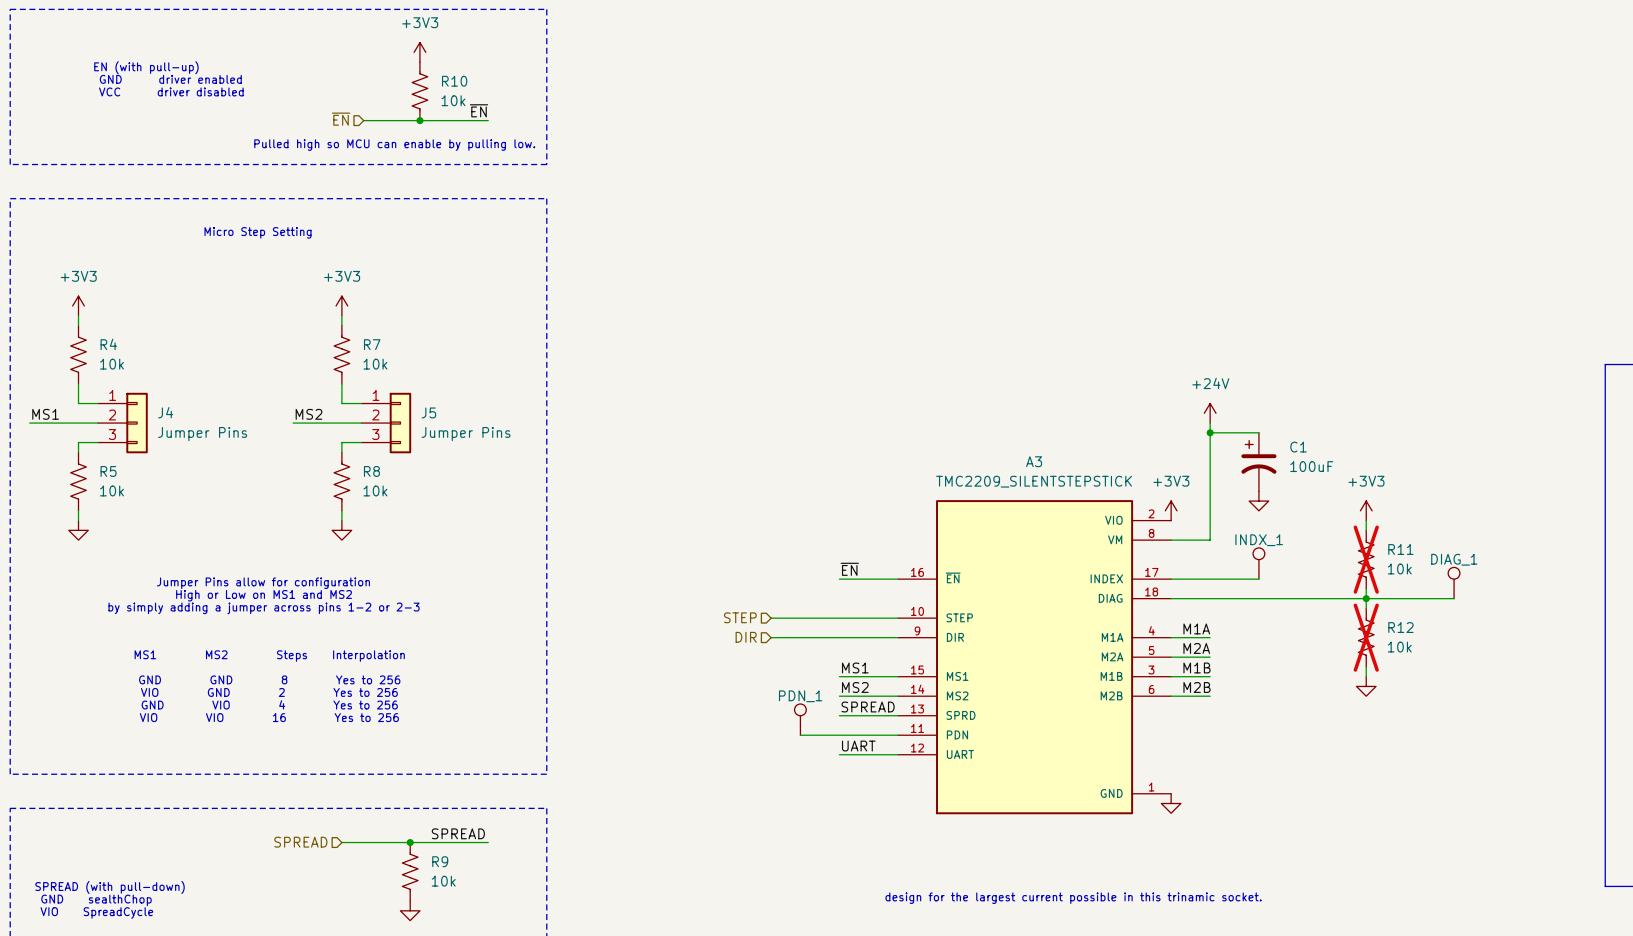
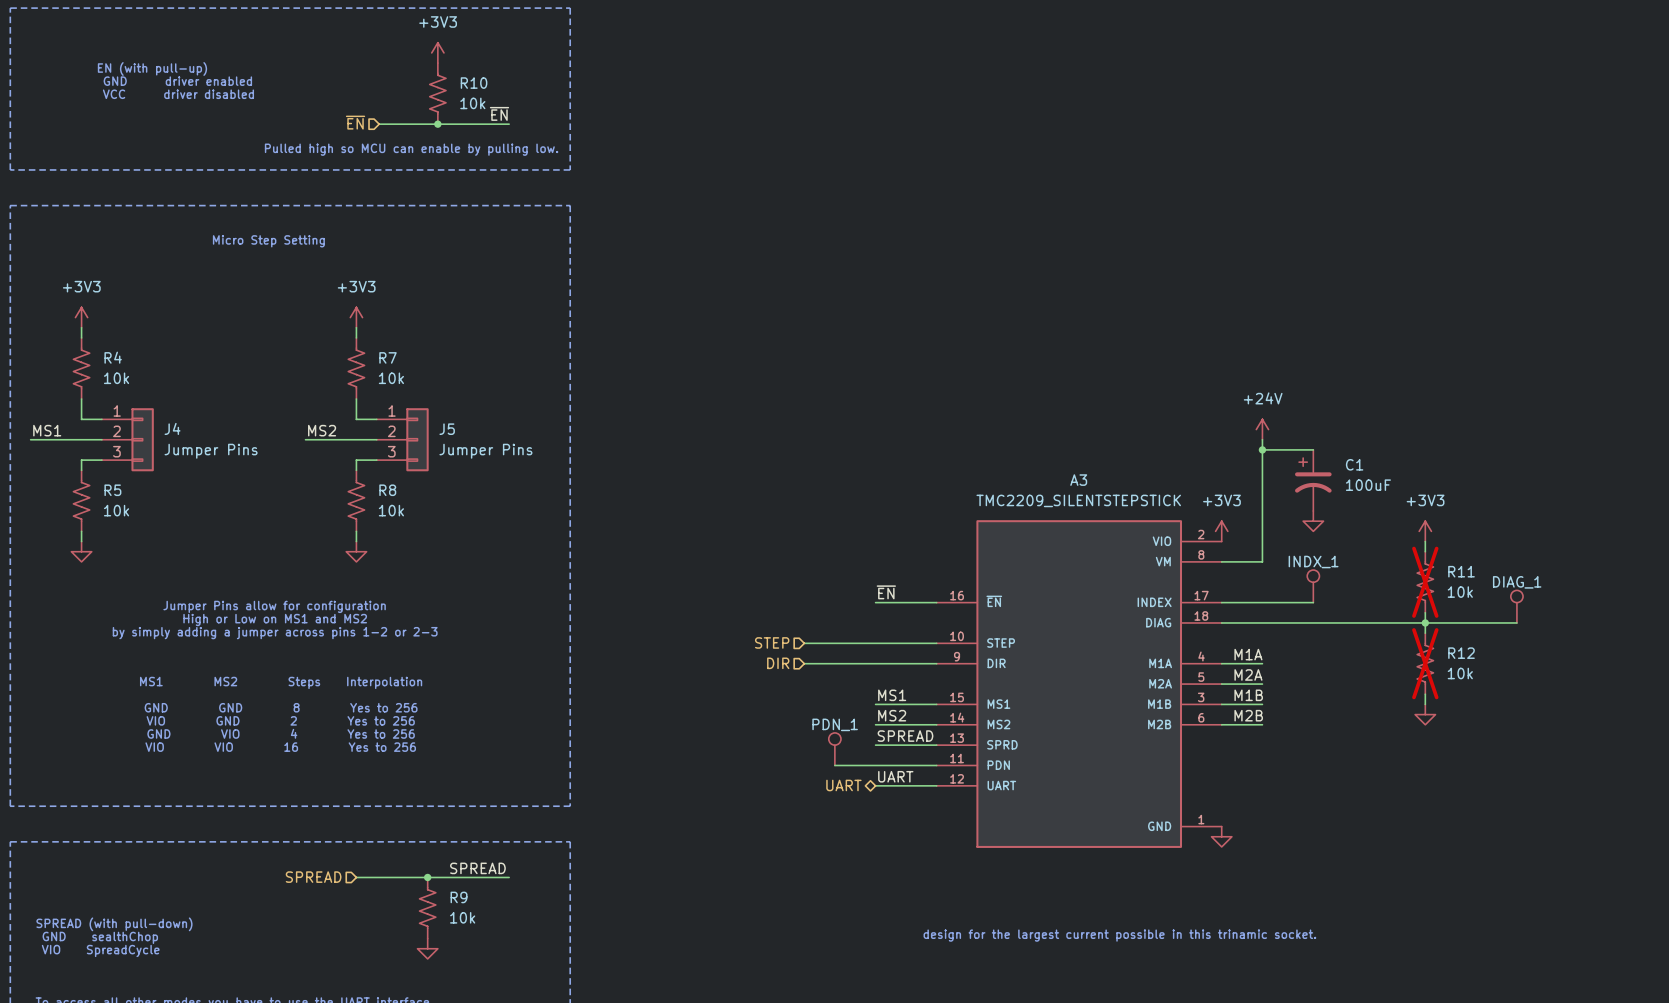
hierarchical label: none -> UART (843, 785)

